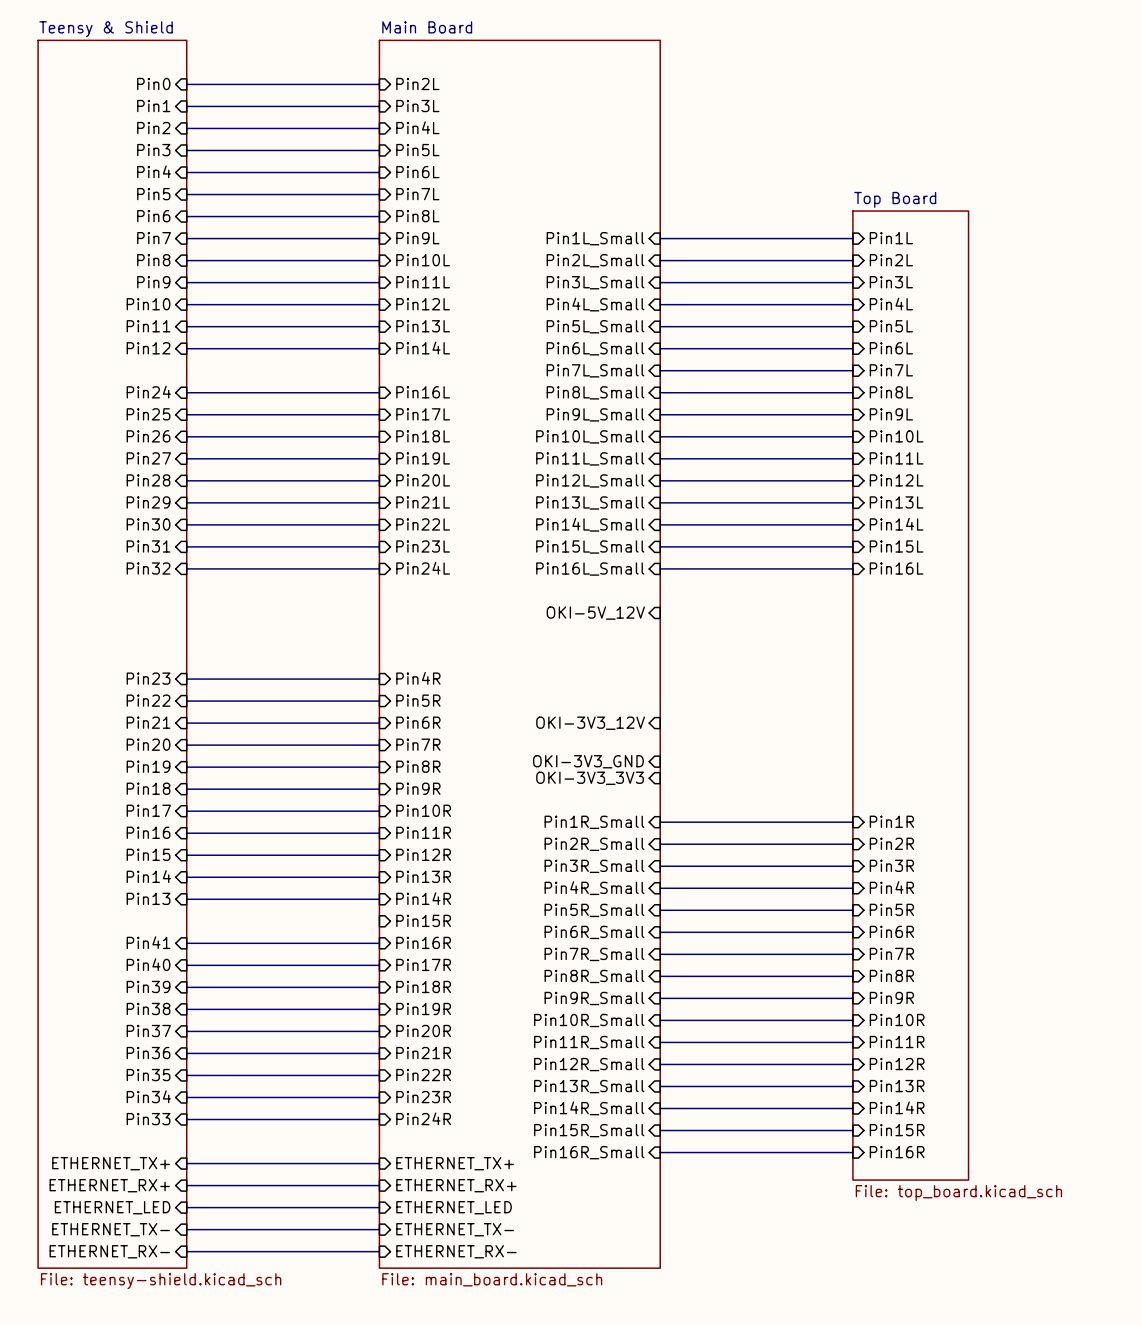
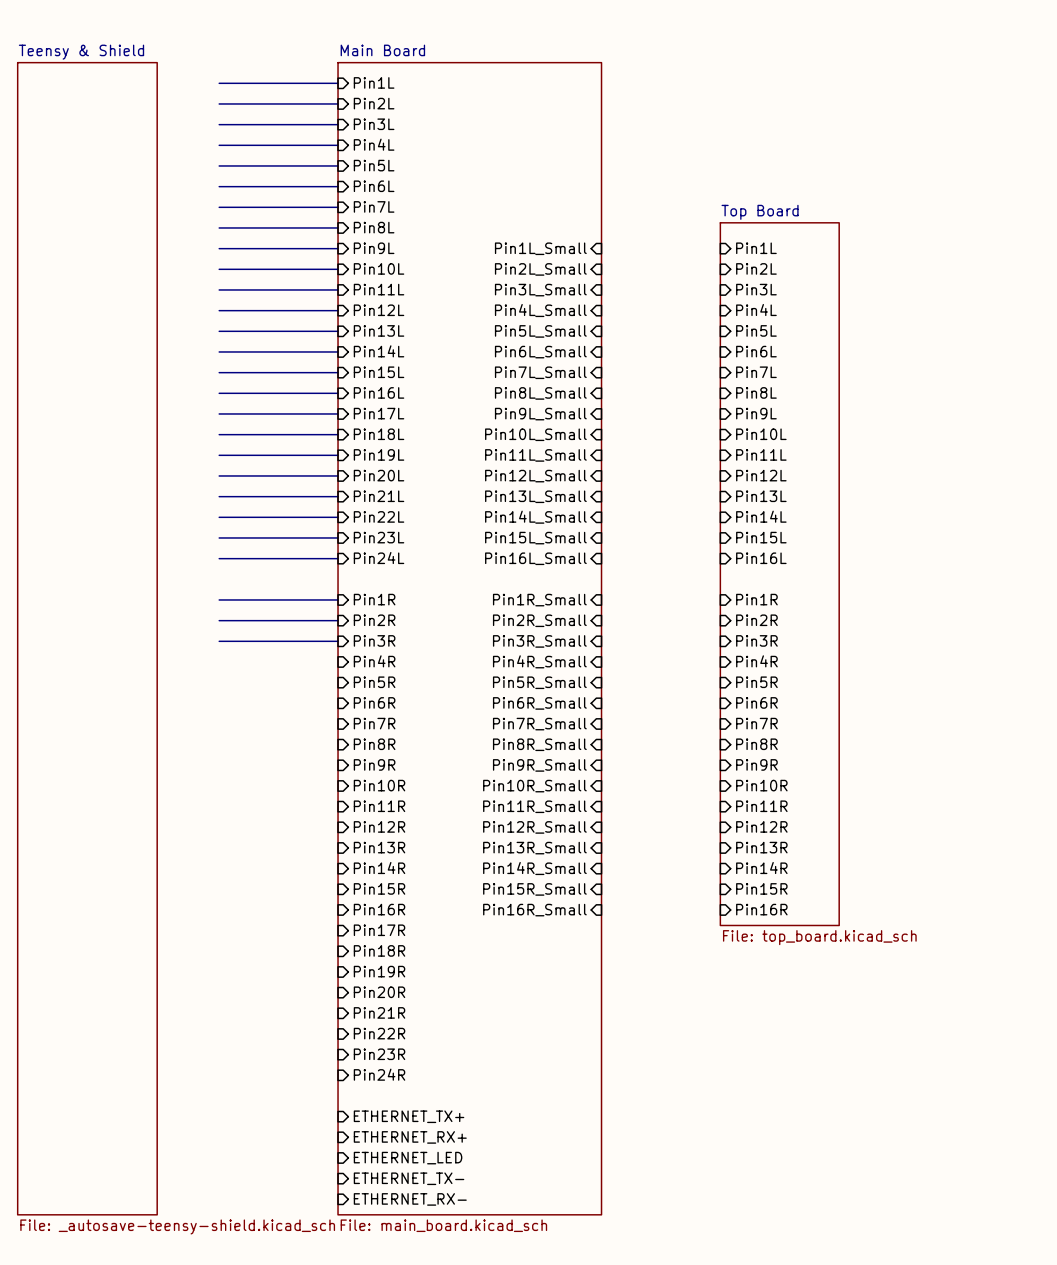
sheet pin: none -> Pin1L (374, 82)
wire: none -> (219, 83) (338, 83)
sheet pin: Pin0 (153, 84) -> none
wire: (186, 84) (252, 84) -> none
sheet pin: Pin1 (153, 106) -> none
wire: (186, 106) (252, 106) -> none
sheet pin: Pin2 (153, 128) -> none
wire: (186, 128) (252, 128) -> none
sheet pin: Pin3 (153, 150) -> none
wire: (186, 150) (252, 150) -> none
sheet pin: Pin4 (154, 171) -> none
wire: (186, 172) (252, 172) -> none
sheet pin: Pin5 (153, 194) -> none
wire: (186, 194) (252, 194) -> none
sheet pin: Pin6 (153, 216) -> none
wire: (186, 216) (252, 216) -> none
sheet pin: Pin7 (154, 238) -> none
wire: (186, 238) (252, 238) -> none
wire: (660, 238) (852, 238) -> none
sheet pin position: Pin1L (891, 238) -> Pin1L (756, 248)
sheet pin: Pin8 (153, 260) -> none
wire: (186, 260) (252, 260) -> none
wire: (660, 260) (852, 260) -> none
sheet pin position: Pin2L (891, 260) -> Pin2L (756, 268)
sheet pin: Pin9 (153, 282) -> none
wire: (186, 282) (252, 282) -> none
wire: (660, 282) (852, 282) -> none
sheet pin position: Pin3L (891, 282) -> Pin3L (756, 289)
sheet pin position: Pin4L (891, 303) -> Pin4L (756, 310)
sheet pin: Pin10 (148, 304) -> none
wire: (186, 304) (252, 304) -> none
wire: (660, 304) (852, 304) -> none
sheet pin: Pin11 (148, 326) -> none
wire: (186, 326) (252, 326) -> none
wire: (660, 326) (852, 326) -> none
sheet pin position: Pin5L (891, 326) -> Pin5L (756, 330)
sheet pin: Pin12 (148, 348) -> none
wire: (186, 348) (252, 348) -> none
wire: (660, 348) (852, 348) -> none
sheet pin position: Pin6L (891, 348) -> Pin6L (756, 351)
wire: none -> (219, 372) (338, 372)
sheet pin: none -> Pin15L (379, 372)
wire: (660, 370) (852, 370) -> none
sheet pin position: Pin7L (891, 370) -> Pin7L (756, 372)
sheet pin: Pin24 (148, 392) -> none
wire: (186, 392) (252, 392) -> none
wire: (660, 392) (852, 392) -> none
sheet pin position: Pin8L (891, 392) -> Pin8L (756, 392)
sheet pin: Pin25 (148, 414) -> none
wire: (186, 414) (252, 414) -> none
wire: (660, 414) (852, 414) -> none
sheet pin position: Pin9L (891, 414) -> Pin9L (756, 413)
sheet pin: Pin26 (148, 436) -> none
wire: (186, 436) (252, 436) -> none
wire: (660, 436) (852, 436) -> none
sheet pin position: Pin10L (896, 436) -> Pin10L (761, 434)
sheet pin: Pin27 (148, 458) -> none
wire: (186, 458) (252, 458) -> none
wire: (660, 458) (852, 458) -> none
sheet pin position: Pin11L (896, 458) -> Pin11L (761, 454)
sheet pin: Pin28 (148, 480) -> none
wire: (186, 480) (252, 480) -> none
wire: (660, 480) (852, 480) -> none
sheet pin position: Pin12L (896, 480) -> Pin12L (761, 475)
sheet pin: Pin29 (148, 502) -> none
wire: (186, 502) (252, 502) -> none
wire: (660, 502) (852, 502) -> none
sheet pin position: Pin13L (896, 502) -> Pin13L (761, 496)
sheet pin: Pin30 (148, 524) -> none
wire: (186, 524) (252, 524) -> none
wire: (660, 524) (852, 524) -> none
sheet pin position: Pin14L (896, 524) -> Pin14L (761, 516)
sheet pin: Pin31 (148, 546) -> none
wire: (186, 546) (252, 546) -> none
wire: (660, 546) (852, 546) -> none
sheet pin position: Pin15L (896, 546) -> Pin15L (761, 537)
sheet pin: Pin32 (148, 568) -> none
wire: (186, 568) (252, 568) -> none
wire: (660, 568) (852, 568) -> none
sheet pin position: Pin16L (896, 568) -> Pin16L (761, 558)
sheet Top Board: none -> File: top_board.kicad_sch (779, 574)
wire: none -> (219, 599) (338, 599)
sheet pin: none -> Pin1R (374, 599)
sheet pin: none -> Pin1R (756, 599)
sheet pin: OKI-5V_12V (595, 613) -> Pin1R_Small (539, 600)
sheet pin: none -> Pin2R (374, 620)
sheet pin: none -> Pin2R (756, 620)
wire: none -> (219, 620) (338, 620)
sheet pin: none -> Pin3R (374, 640)
sheet pin: none -> Pin3R (756, 640)
wire: none -> (219, 641) (338, 641)
sheet pin: Pin23 (148, 678) -> none
sheet pin: none -> Pin4R (756, 661)
wire: (186, 679) (379, 679) -> none
sheet Top Board: File: top_board.kicad_sch (910, 695) -> none
sheet pin: Pin22 (148, 700) -> none
sheet pin: none -> Pin5R (756, 682)
wire: (186, 701) (379, 701) -> none
sheet pin: Pin21 (148, 722) -> none
sheet pin: none -> Pin6R (756, 702)
wire: (186, 723) (379, 723) -> none
sheet pin: OKI-3V3_12V (590, 723) -> Pin6R_Small (539, 703)
sheet pin: Pin20 (148, 744) -> none
sheet pin: none -> Pin7R (756, 723)
wire: (186, 745) (379, 745) -> none
sheet pin: OKI-3V3_GND (588, 761) -> none
sheet pin: Pin19 (148, 766) -> none
sheet pin: none -> Pin8R (756, 744)
wire: (186, 767) (379, 767) -> none
sheet pin: OKI-3V3_3V3 (590, 778) -> none
sheet pin: Pin18 (148, 788) -> none
sheet pin: none -> Pin9R (756, 764)
wire: (186, 789) (379, 789) -> none
sheet pin: Pin17 (148, 810) -> none
sheet pin: none -> Pin10R (761, 785)
wire: (186, 811) (379, 811) -> none
sheet pin: Pin1R (891, 821) -> none
sheet pin: Pin1R_Small (594, 822) -> none
wire: (660, 822) (852, 822) -> none
sheet pin: Pin16 (148, 832) -> none
sheet pin: none -> Pin11R (761, 806)
wire: (186, 833) (379, 833) -> none
sheet pin: Pin2R (891, 843) -> none
sheet pin position: Pin2R_Small (594, 844) -> Pin2R_Small (539, 620)
wire: (660, 844) (852, 844) -> none
sheet pin: Pin15 (148, 854) -> none
sheet pin: none -> Pin12R (761, 826)
wire: (186, 855) (379, 855) -> none
sheet pin: Pin3R (891, 865) -> none
sheet pin position: Pin3R_Small (594, 866) -> Pin3R_Small (539, 641)
wire: (660, 866) (852, 866) -> none
sheet pin: Pin14 (148, 876) -> none
sheet pin: none -> Pin13R (761, 847)
wire: (186, 877) (379, 877) -> none
sheet pin: Pin4R (891, 887) -> none
sheet pin position: Pin4R_Small (594, 888) -> Pin4R_Small (539, 661)
wire: (660, 888) (852, 888) -> none
sheet pin: Pin13 (148, 898) -> none
sheet pin: none -> Pin14R (761, 868)
wire: (186, 899) (379, 899) -> none
sheet pin: Pin5R (891, 909) -> none
sheet pin position: Pin5R_Small (594, 910) -> Pin5R_Small (539, 682)
wire: (660, 910) (852, 910) -> none
sheet pin: none -> Pin15R (761, 888)
sheet pin: Pin6R (891, 931) -> none
sheet pin: Pin6R_Small (594, 932) -> none
wire: (660, 932) (852, 932) -> none
sheet pin: Pin41 (148, 942) -> none
sheet pin: none -> Pin16R (761, 909)
wire: (186, 943) (379, 943) -> none
sheet pin: Pin7R (891, 953) -> none
sheet pin position: Pin7R_Small (594, 954) -> Pin7R_Small (539, 724)
wire: (660, 954) (852, 954) -> none
sheet pin: Pin40 (148, 964) -> none
wire: (186, 965) (379, 965) -> none
sheet pin: Pin8R (891, 975) -> none
sheet pin position: Pin8R_Small (594, 976) -> Pin8R_Small (539, 744)
wire: (660, 976) (852, 976) -> none
sheet pin: Pin39 (148, 986) -> none
wire: (186, 987) (379, 987) -> none
sheet pin: Pin9R (891, 997) -> none
sheet pin position: Pin9R_Small (594, 998) -> Pin9R_Small (539, 765)
wire: (660, 998) (852, 998) -> none
sheet pin: Pin38 (148, 1008) -> none
wire: (186, 1009) (379, 1009) -> none
sheet pin: Pin10R (897, 1019) -> none
sheet pin position: Pin10R_Small (589, 1020) -> Pin10R_Small (534, 786)
wire: (660, 1020) (852, 1020) -> none
sheet pin: Pin37 (148, 1031) -> none
wire: (186, 1031) (379, 1031) -> none
sheet pin position: Pin11R_Small (589, 1042) -> Pin11R_Small (534, 806)
wire: (660, 1042) (852, 1042) -> none
sheet pin: Pin11R (897, 1042) -> none
sheet pin: Pin36 (148, 1053) -> none
wire: (186, 1053) (379, 1053) -> none
sheet pin position: Pin12R_Small (589, 1064) -> Pin12R_Small (534, 827)
wire: (660, 1064) (852, 1064) -> none
sheet pin: Pin12R (897, 1064) -> none
sheet pin: Pin35 (148, 1075) -> none
wire: (186, 1075) (379, 1075) -> none
sheet pin position: Pin13R_Small (589, 1086) -> Pin13R_Small (534, 848)
wire: (660, 1086) (852, 1086) -> none
sheet pin: Pin13R (897, 1086) -> none
sheet pin: Pin34 (148, 1096) -> none
wire: (186, 1097) (379, 1097) -> none
sheet pin: Pin14R (897, 1107) -> none
sheet pin position: Pin14R_Small (589, 1108) -> Pin14R_Small (534, 868)
wire: (660, 1108) (852, 1108) -> none
sheet pin: Pin33 (148, 1119) -> none
wire: (186, 1119) (379, 1119) -> none
sheet pin position: Pin15R_Small (589, 1130) -> Pin15R_Small (534, 889)
wire: (660, 1130) (852, 1130) -> none
sheet pin: Pin15R (897, 1130) -> none
sheet pin position: Pin16R_Small (589, 1152) -> Pin16R_Small (534, 910)
wire: (660, 1152) (852, 1152) -> none
sheet pin: Pin16R (897, 1152) -> none
sheet pin: ETHERNET_TX+ (111, 1163) -> none
wire: (186, 1163) (379, 1163) -> none
sheet pin: ETHERNET_RX+ (109, 1185) -> none
wire: (186, 1185) (379, 1185) -> none
sheet pin: ETHERNET_LED (112, 1207) -> none
wire: (186, 1207) (379, 1207) -> none
sheet pin: ETHERNET_TX- (111, 1229) -> none
wire: (186, 1229) (379, 1229) -> none
sheet pin: ETHERNET_RX- (109, 1251) -> none
wire: (186, 1251) (379, 1251) -> none
sheet Teensy & Shield value: File: teensy-shield.kicad_sch (161, 1281) -> File: _autosave-teensy-shield.kicad_sch (177, 1226)

